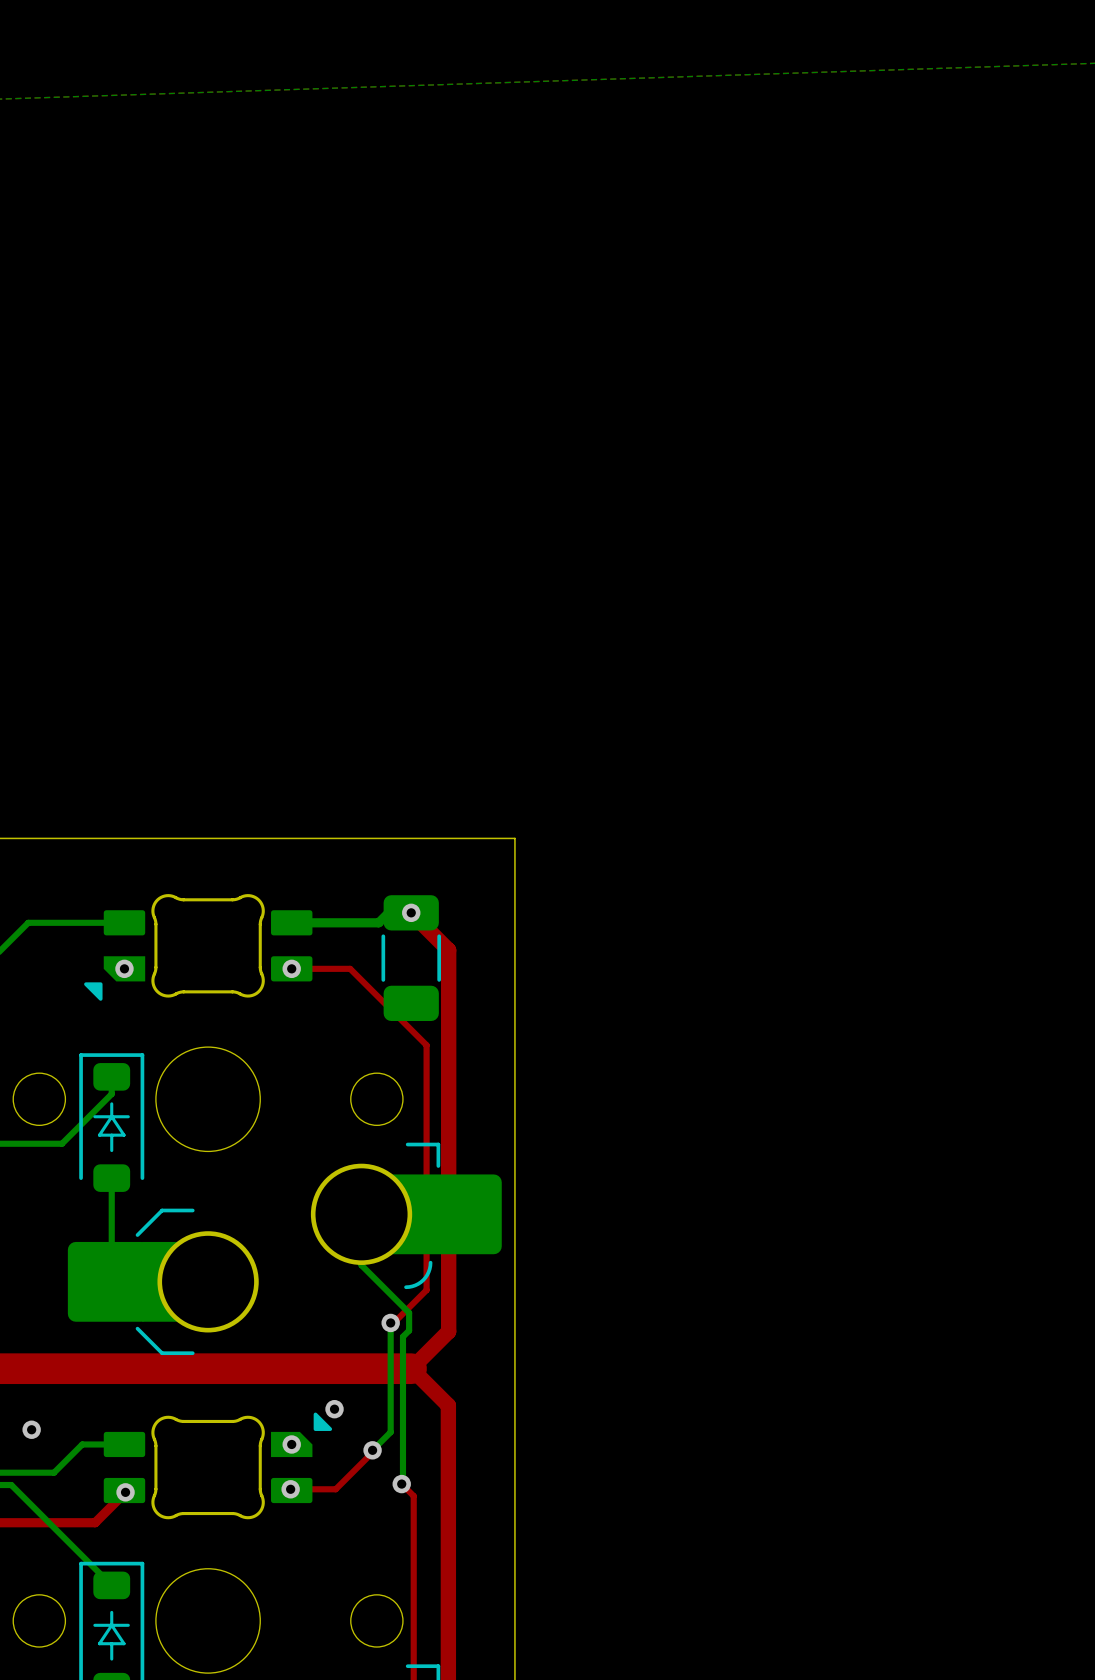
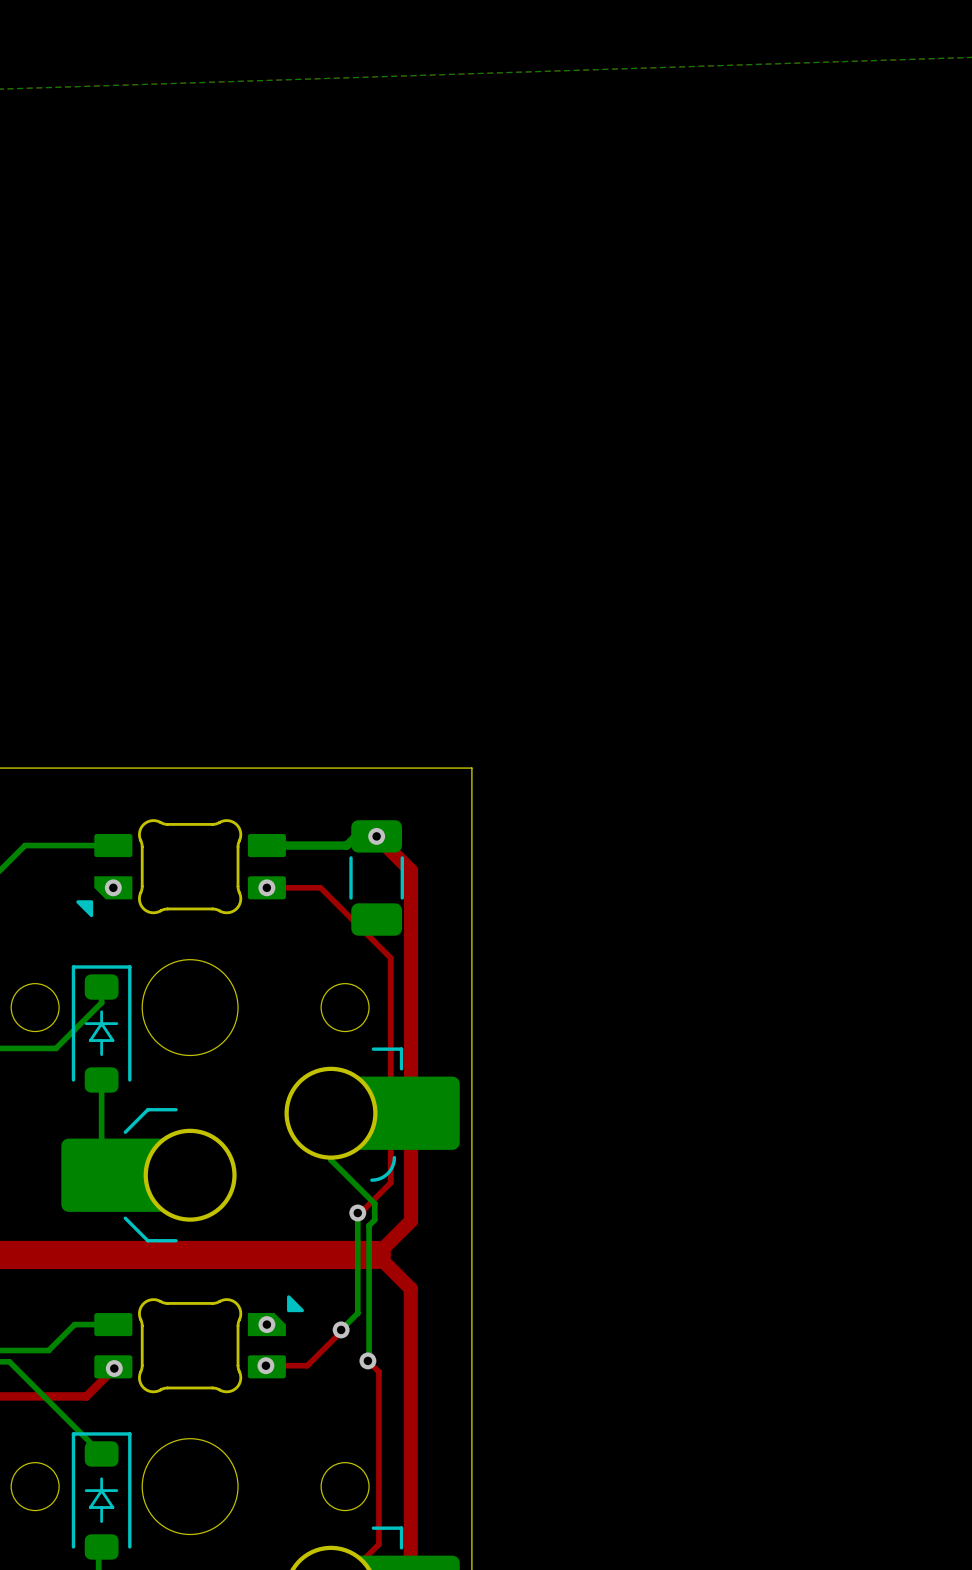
via: (334, 1409) -> none
via: (31, 1429) -> none

